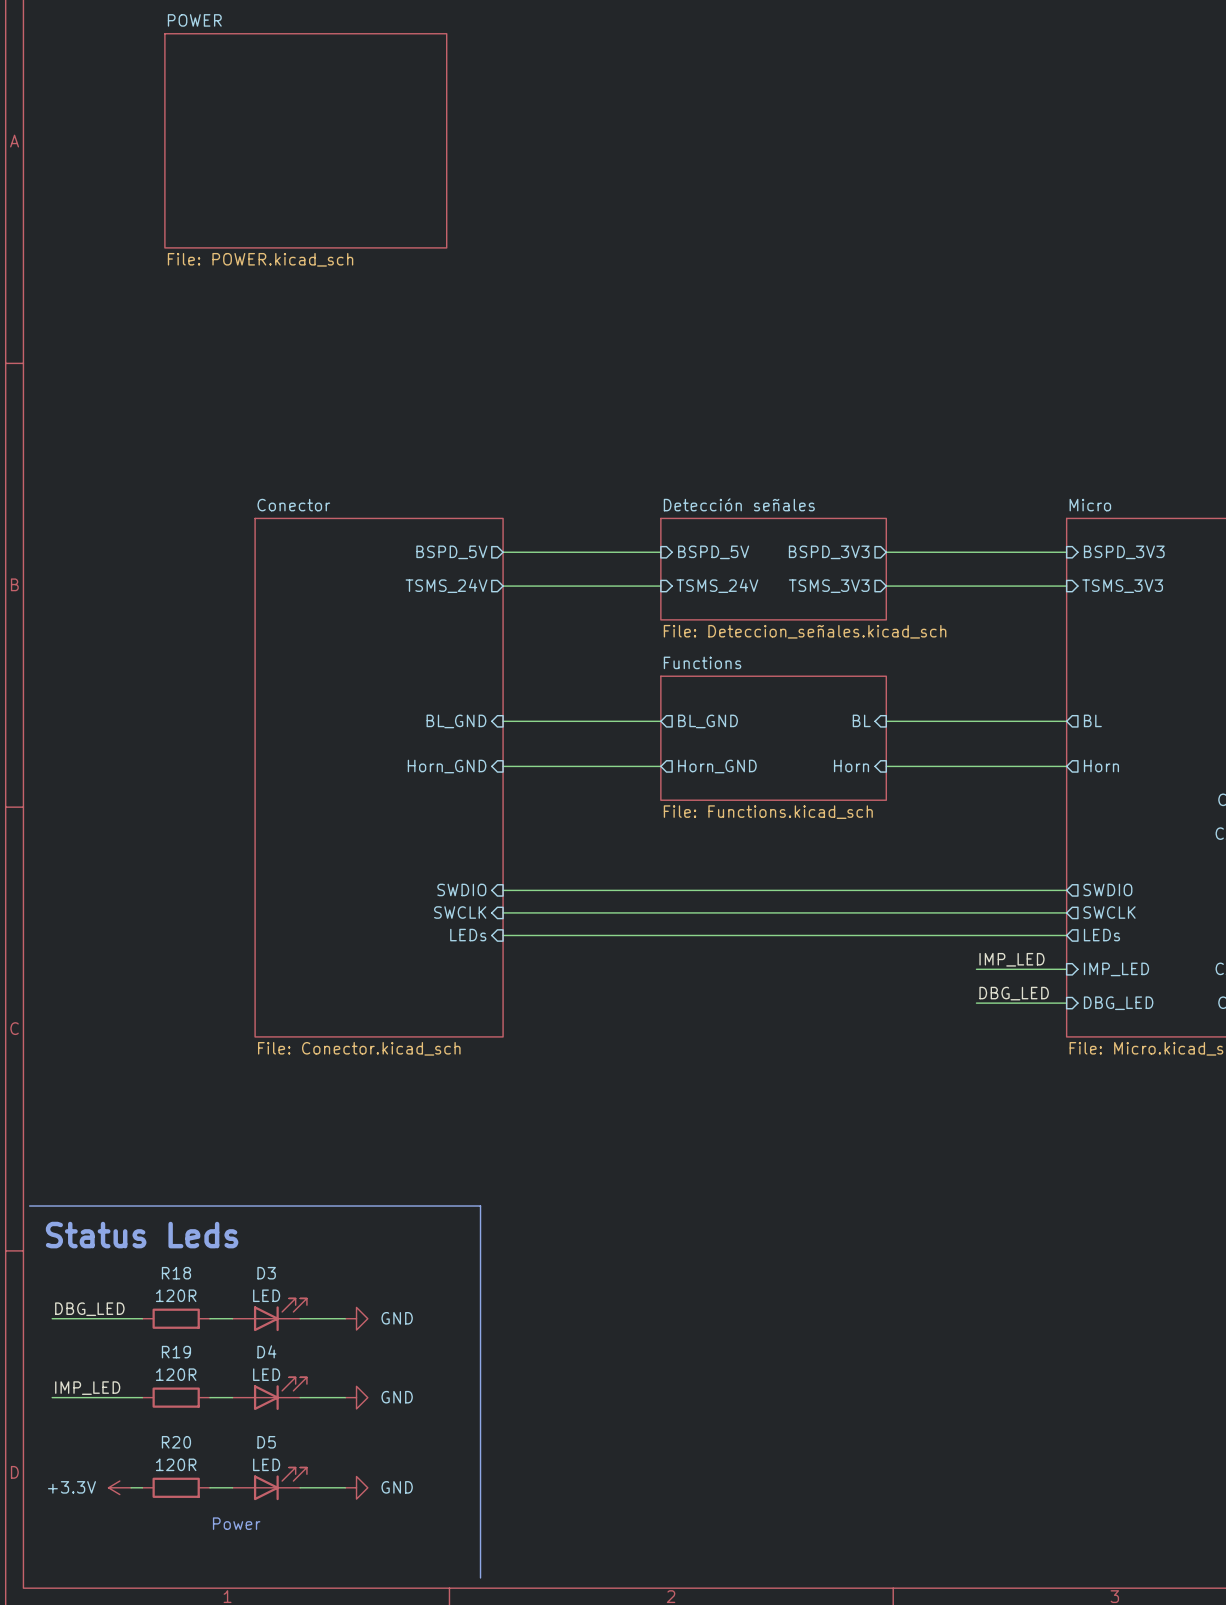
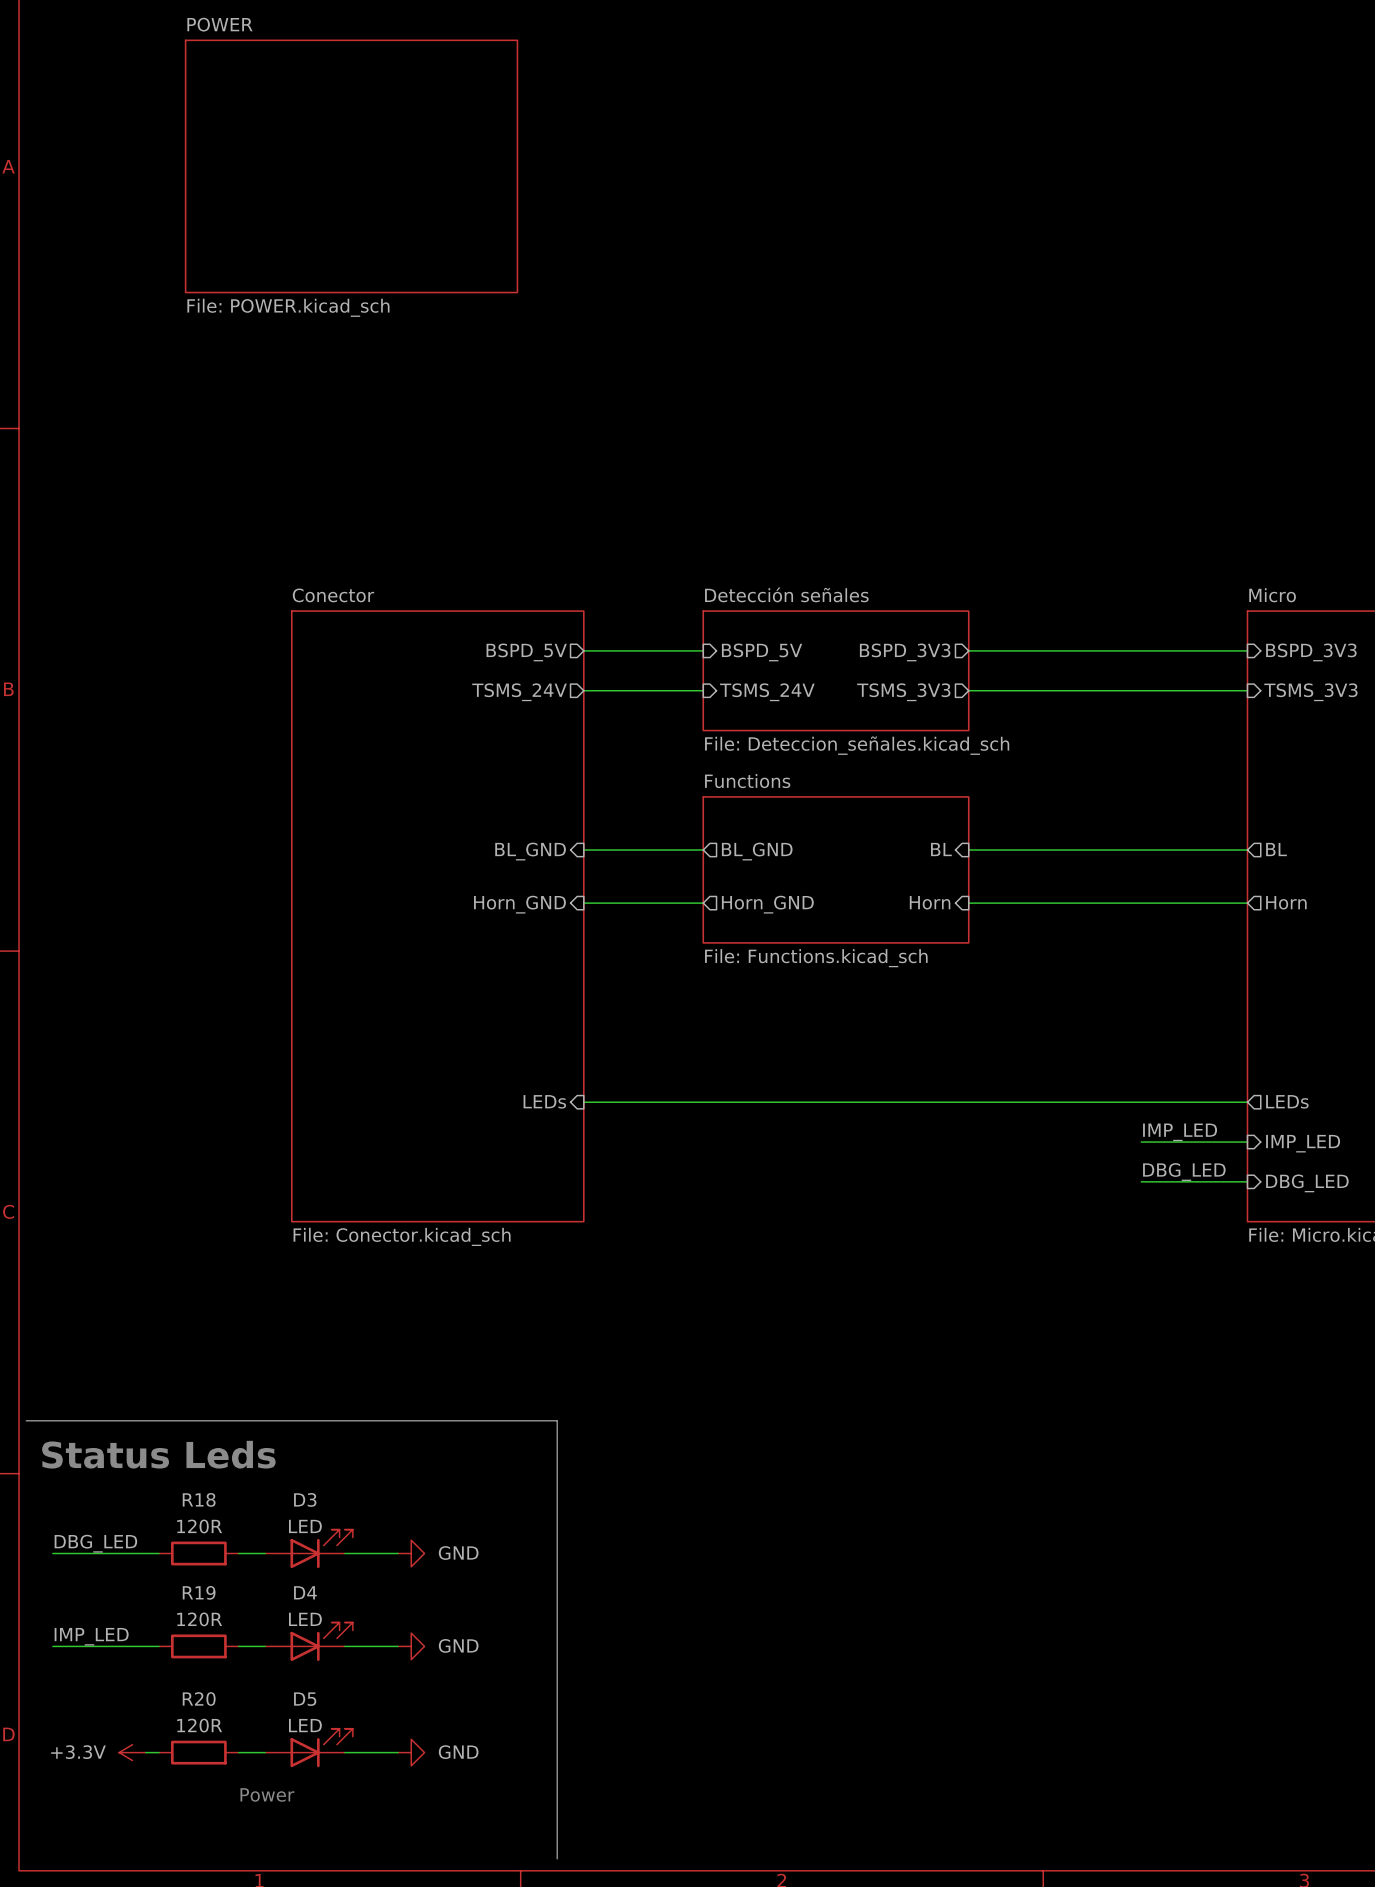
wire: (604, 552) (660, 552) -> none
sheet pin position: BSPD_5V (713, 552) -> BSPD_5V (762, 652)
wire: none -> (968, 650) (1035, 650)
sheet pin position: BSPD_3V3 (829, 552) -> BSPD_3V3 (905, 652)
sheet Detección señales position: (773, 569) -> (836, 670)
sheet pin position: TSMS_24V (717, 585) -> TSMS_24V (767, 692)
wire: (604, 586) (660, 586) -> none
wire: none -> (968, 690) (1035, 690)
sheet pin position: TSMS_3V3 (829, 586) -> TSMS_3V3 (903, 692)
sheet pin position: BL (861, 720) -> BL (941, 849)
wire: (604, 721) (660, 721) -> none
sheet pin position: BL_GND (708, 721) -> BL_GND (757, 851)
wire: none -> (968, 850) (1035, 850)
sheet Functions position: (773, 738) -> (836, 869)
sheet pin position: Horn (851, 765) -> Horn (930, 902)
wire: (604, 766) (660, 766) -> none
sheet pin position: Horn_GND (717, 766) -> Horn_GND (767, 904)
wire: none -> (968, 903) (1035, 903)
sheet pin: SWDIO (461, 889) -> none
sheet pin: SWDIO (1107, 889) -> none
wire: (503, 890) (1066, 890) -> none
sheet pin: SWCLK (460, 912) -> none
wire: (503, 912) (1066, 912) -> none
sheet pin: SWCLK (1109, 912) -> none

